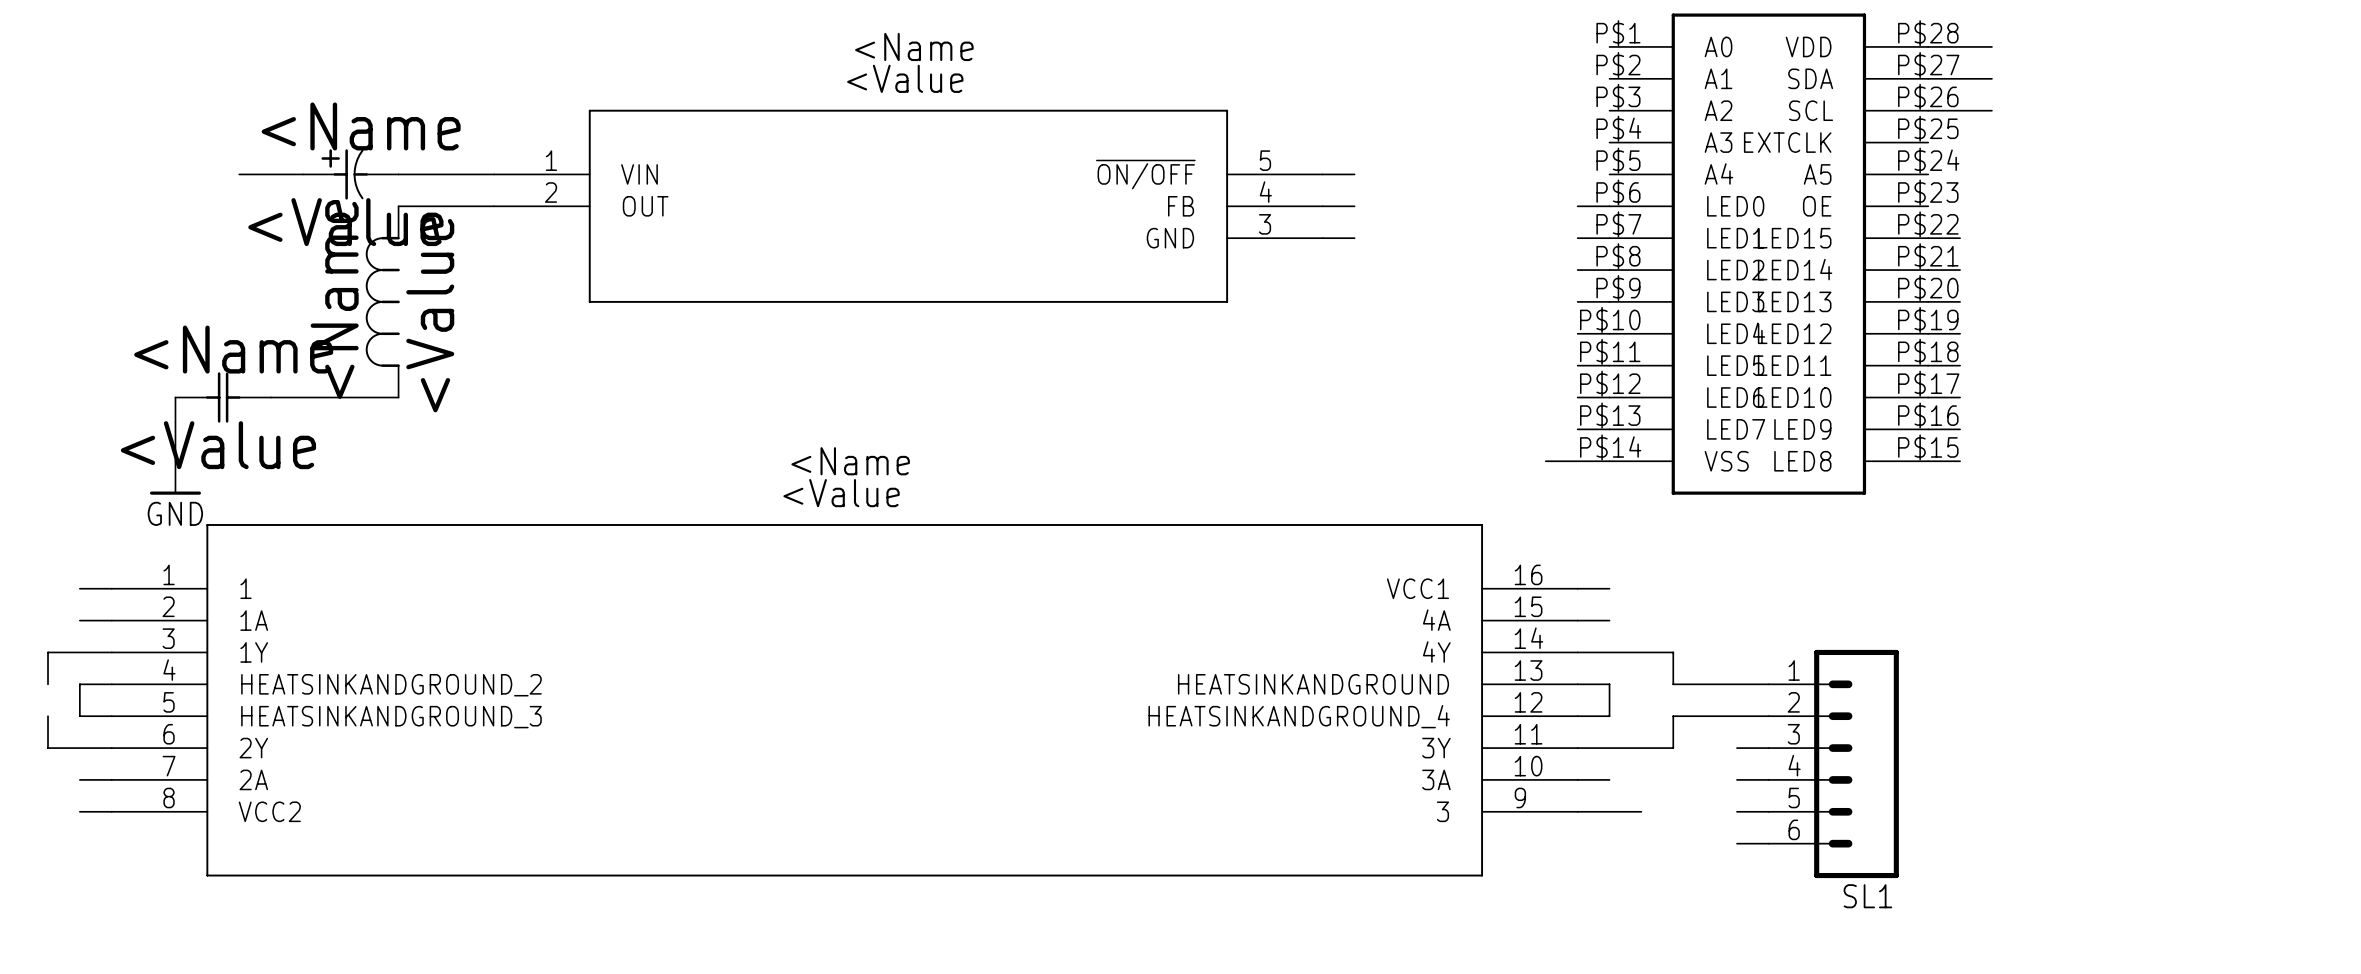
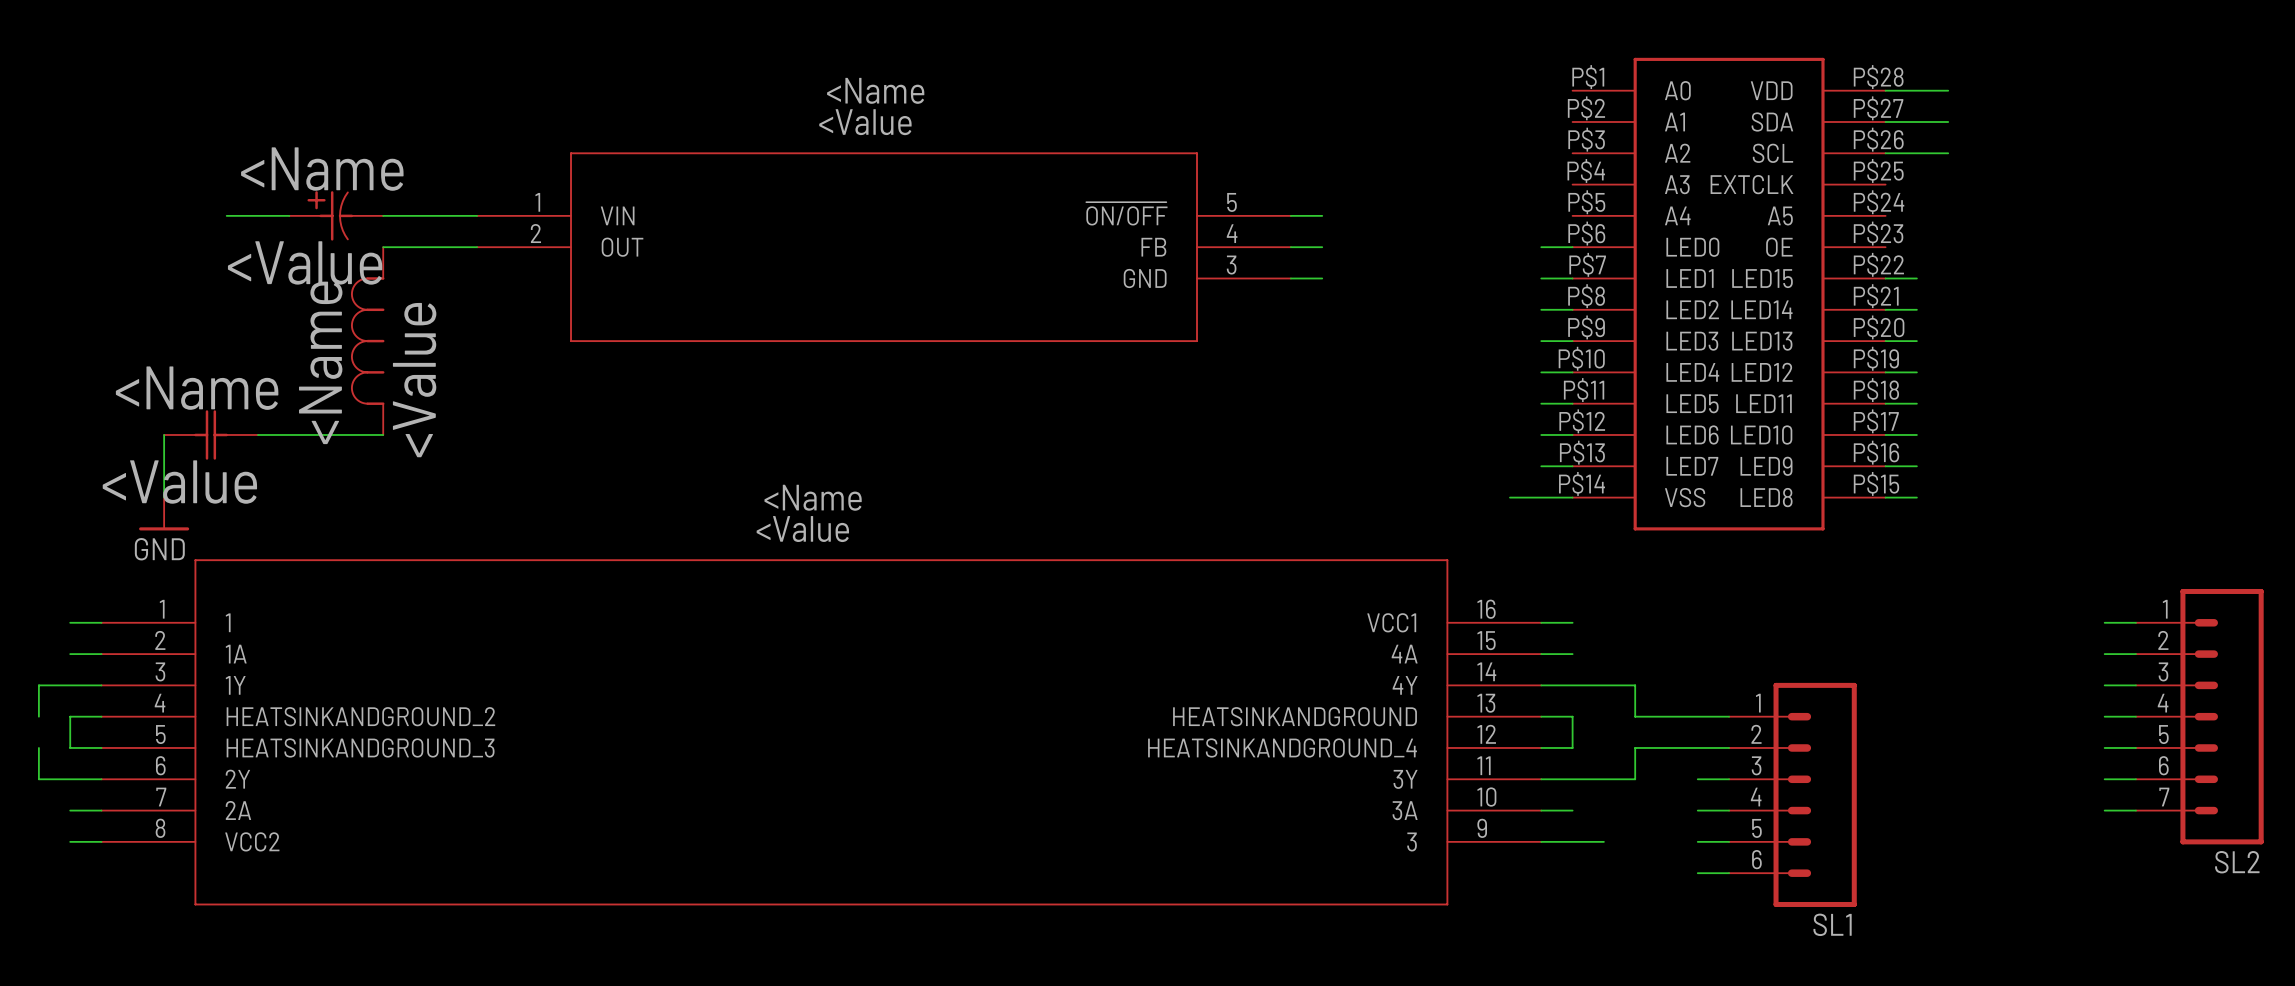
wire: none -> (2104, 622) (2135, 622)
wire: none -> (2104, 654) (2135, 654)
wire: none -> (2104, 685) (2135, 685)
wire: none -> (2104, 716) (2135, 716)
SL2: none -> (2199, 716)
wire: none -> (2104, 747) (2135, 747)
wire: none -> (2104, 779) (2135, 779)
wire: none -> (2104, 810) (2135, 810)

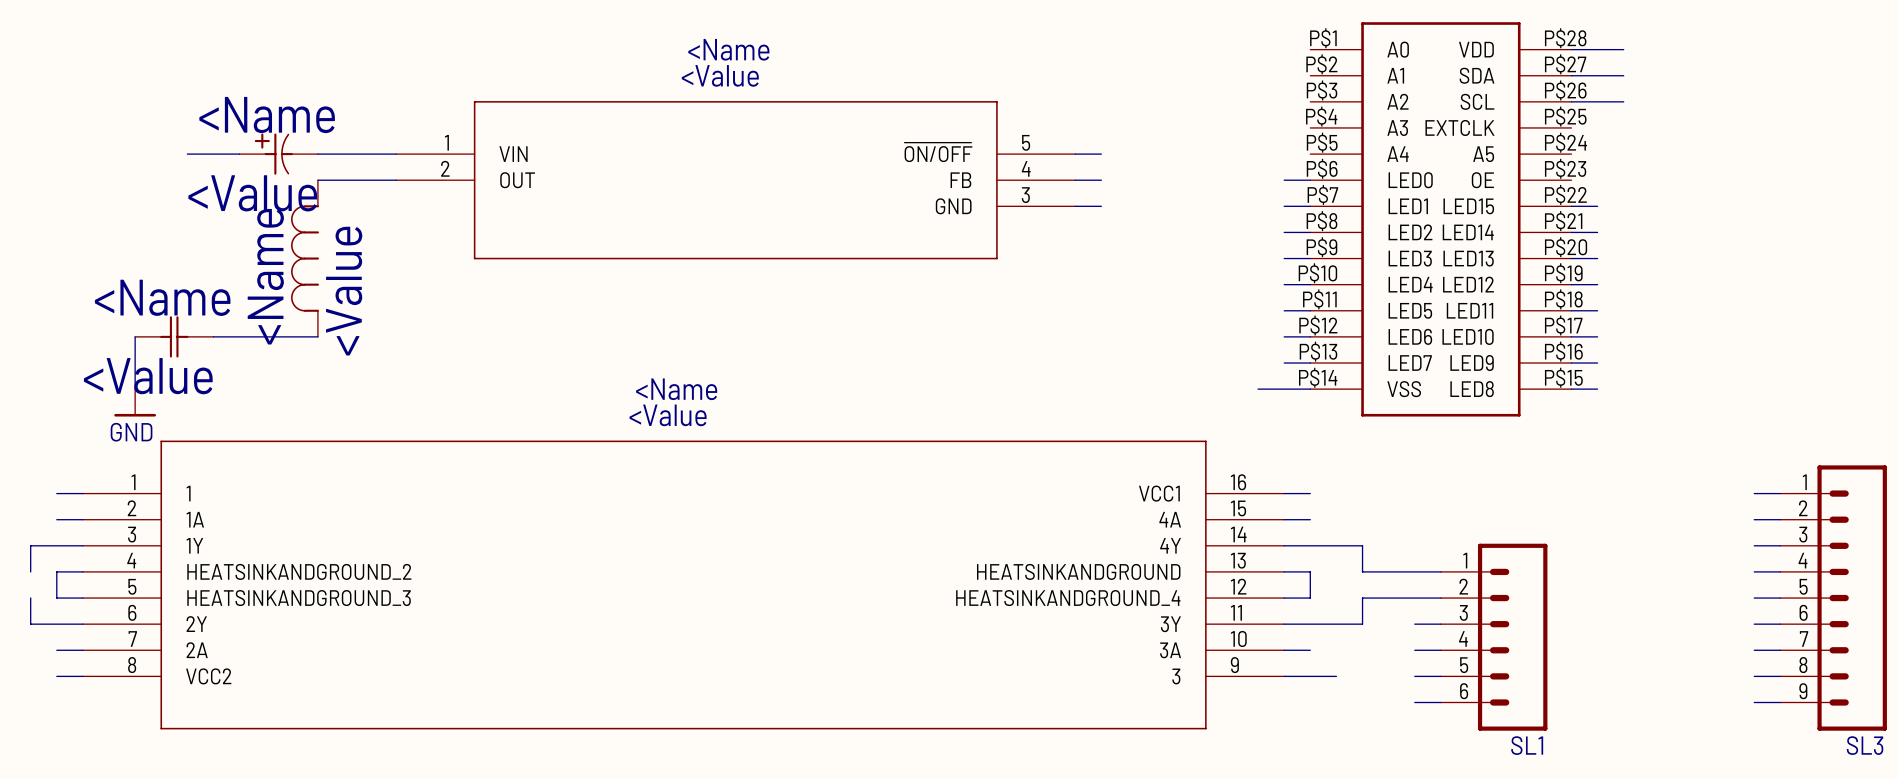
SL2: (2199, 716) -> none
SL3: none -> (1833, 598)
wire: none -> (1754, 676) (1780, 676)
wire: none -> (1754, 702) (1780, 702)

